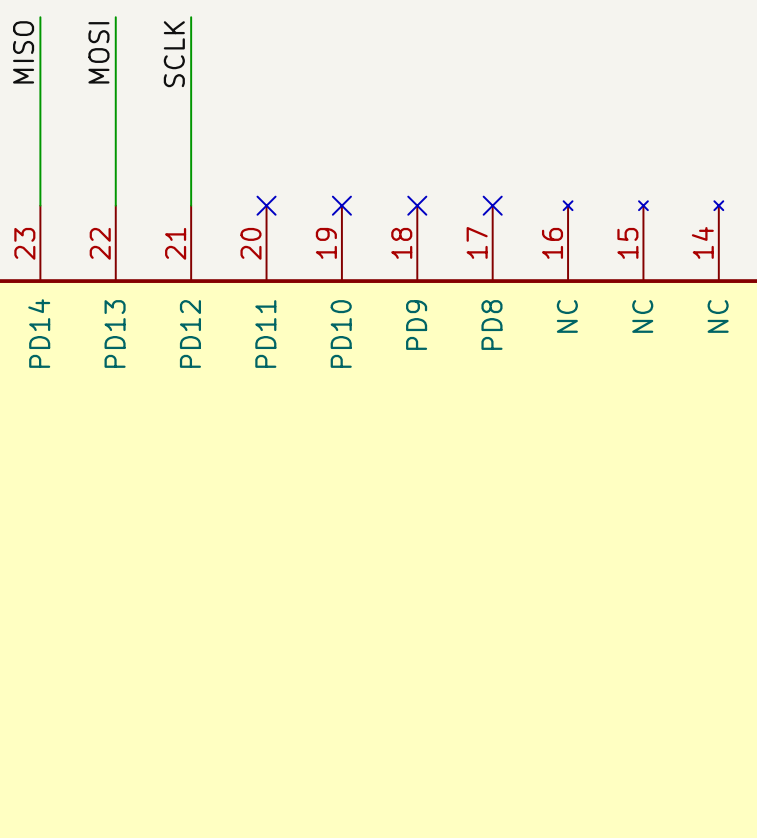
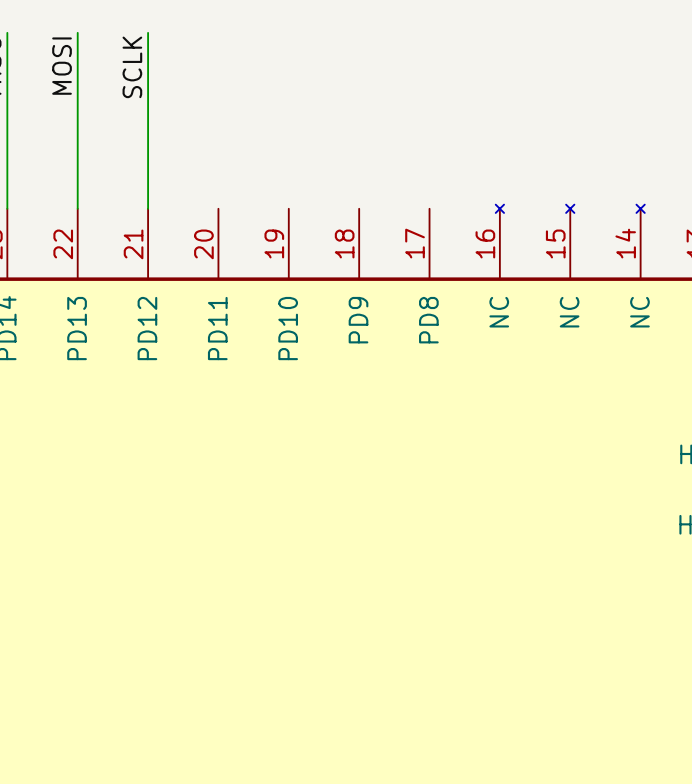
no-connect mark: (266, 205) -> none
no-connect mark: (341, 205) -> none
no-connect mark: (417, 205) -> none
no-connect mark: (492, 205) -> none

